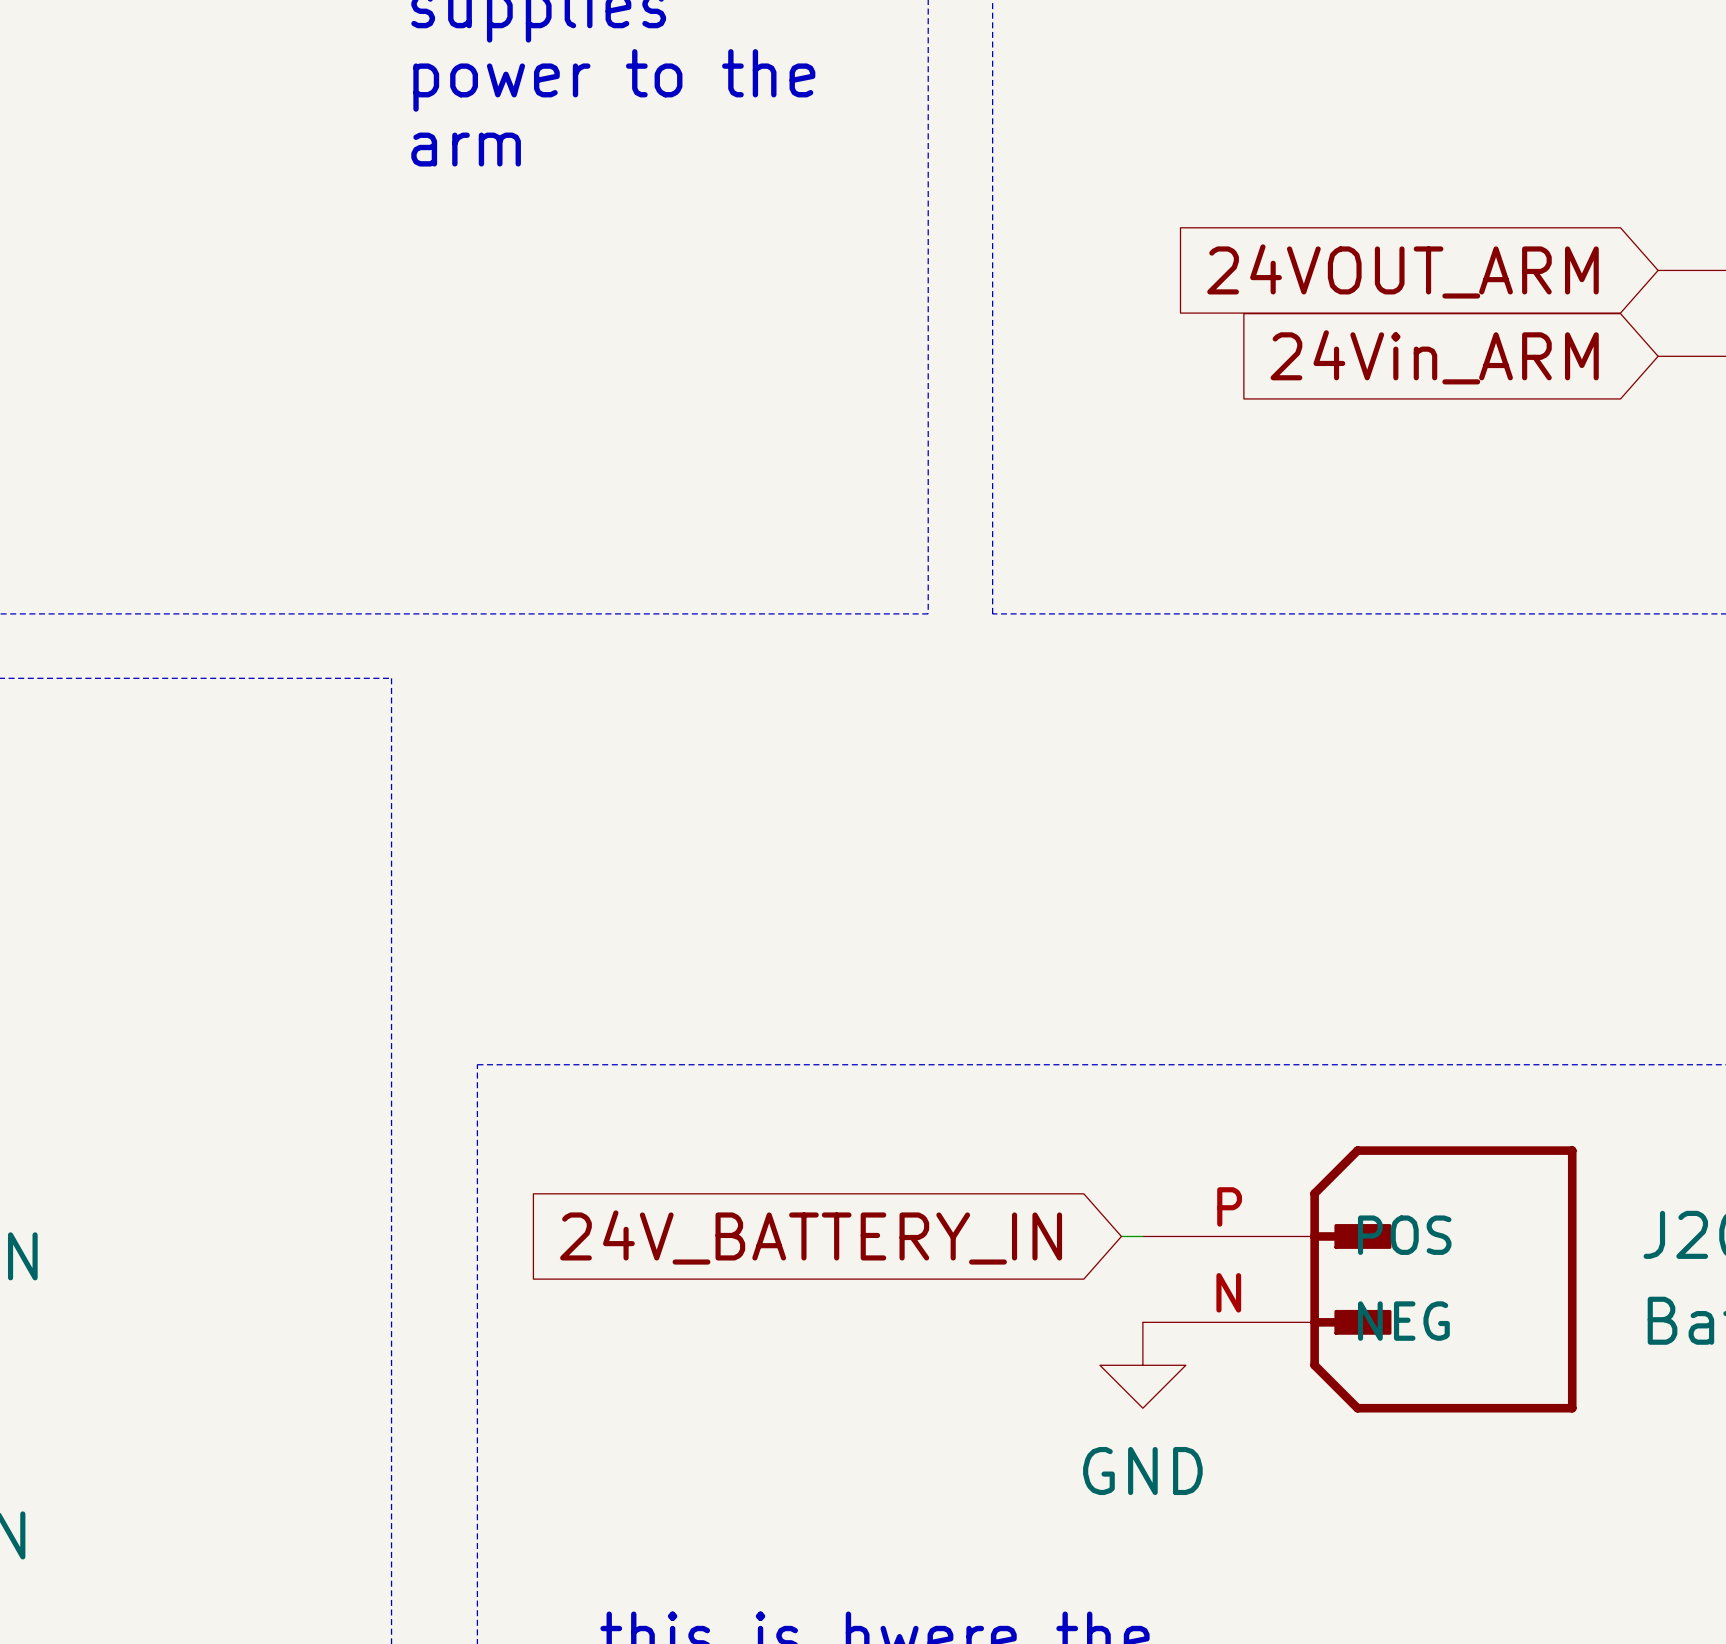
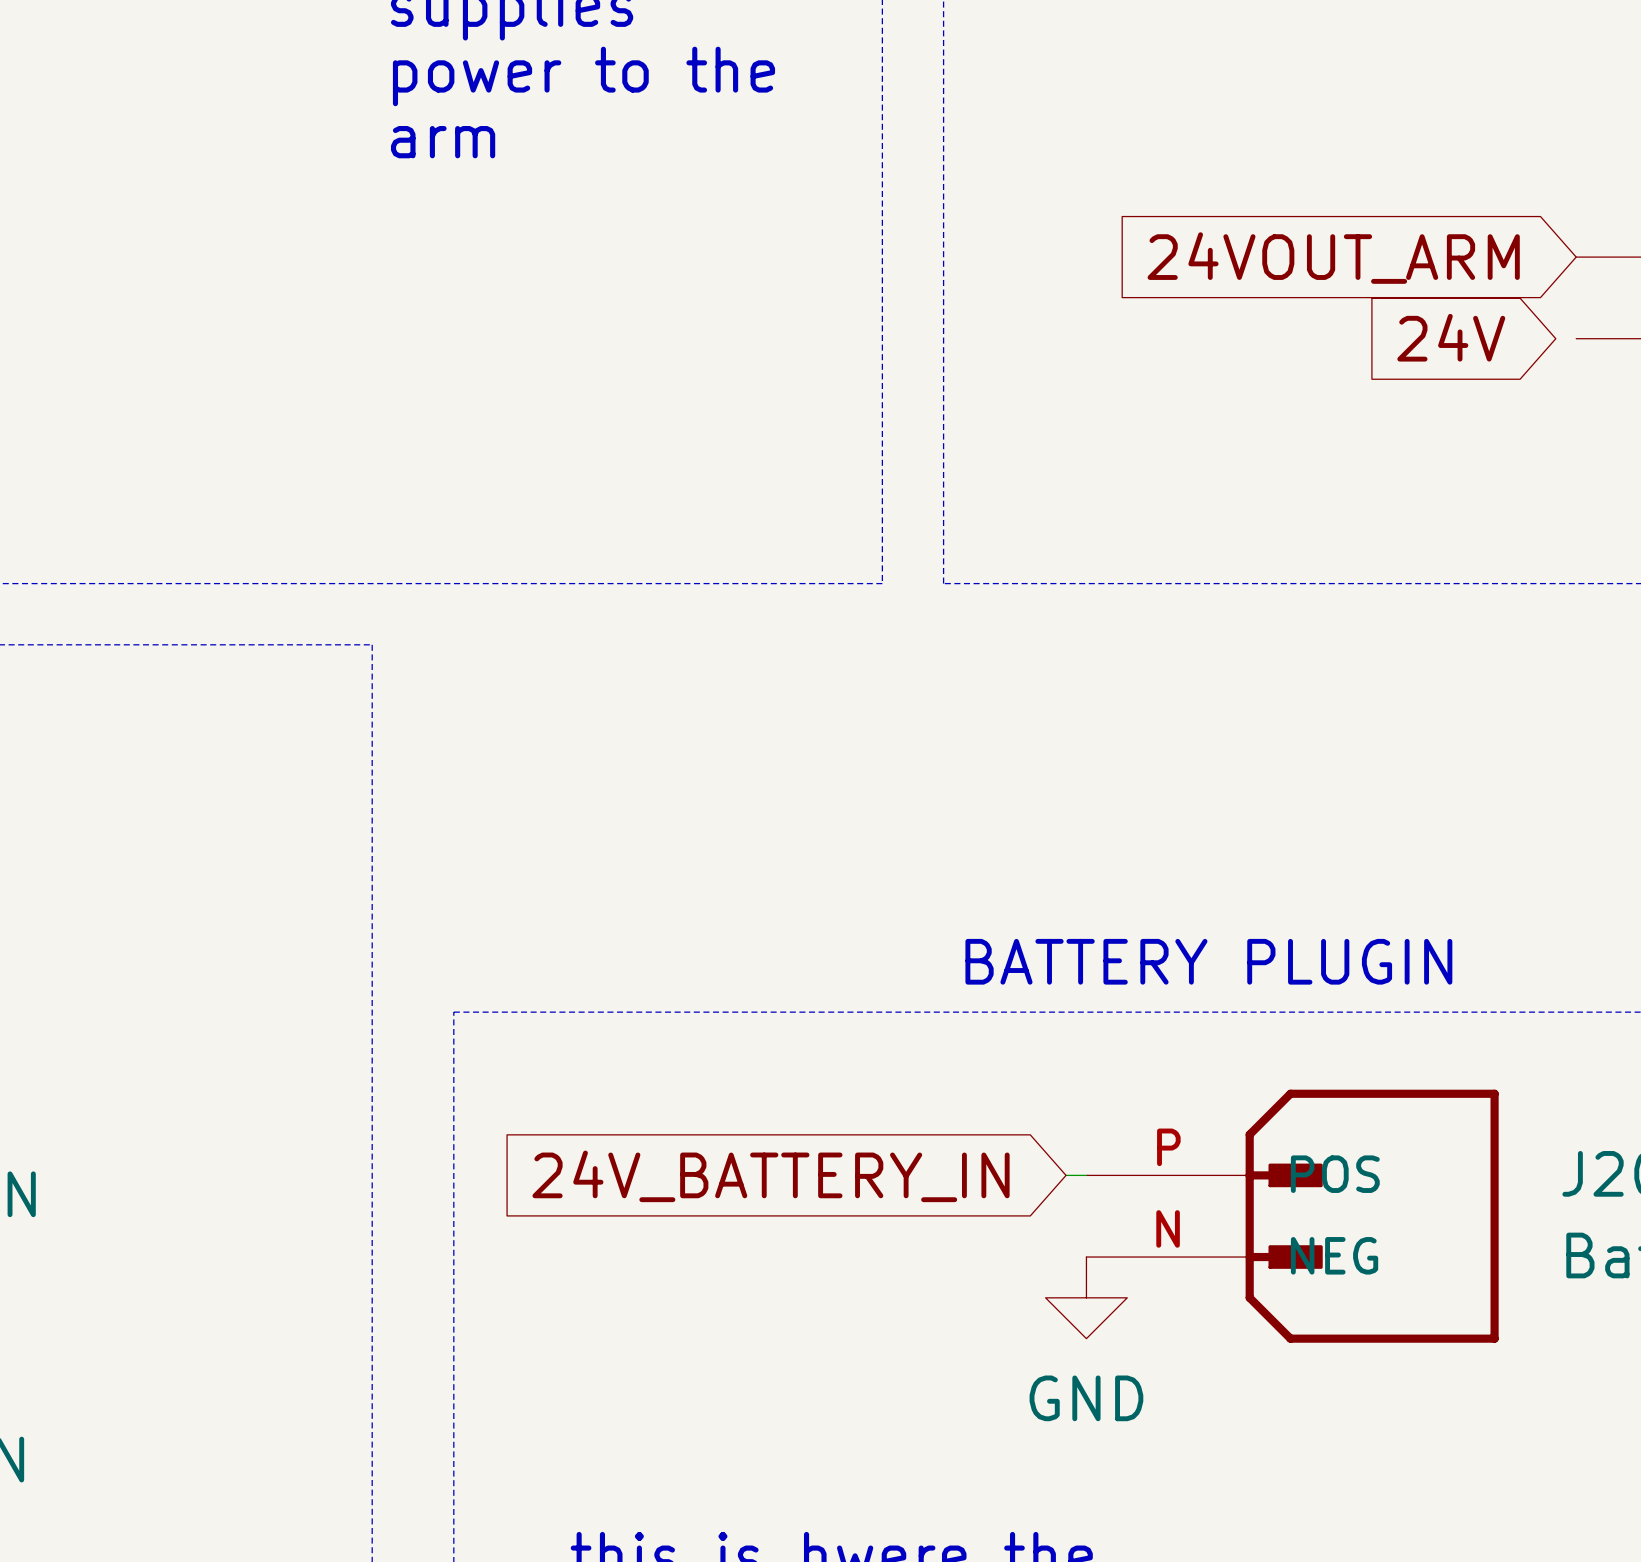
global label: 24Vin_ARM (1434, 357) -> 24V (1451, 337)
text: none -> BATTERY PLUGIN (1208, 961)

